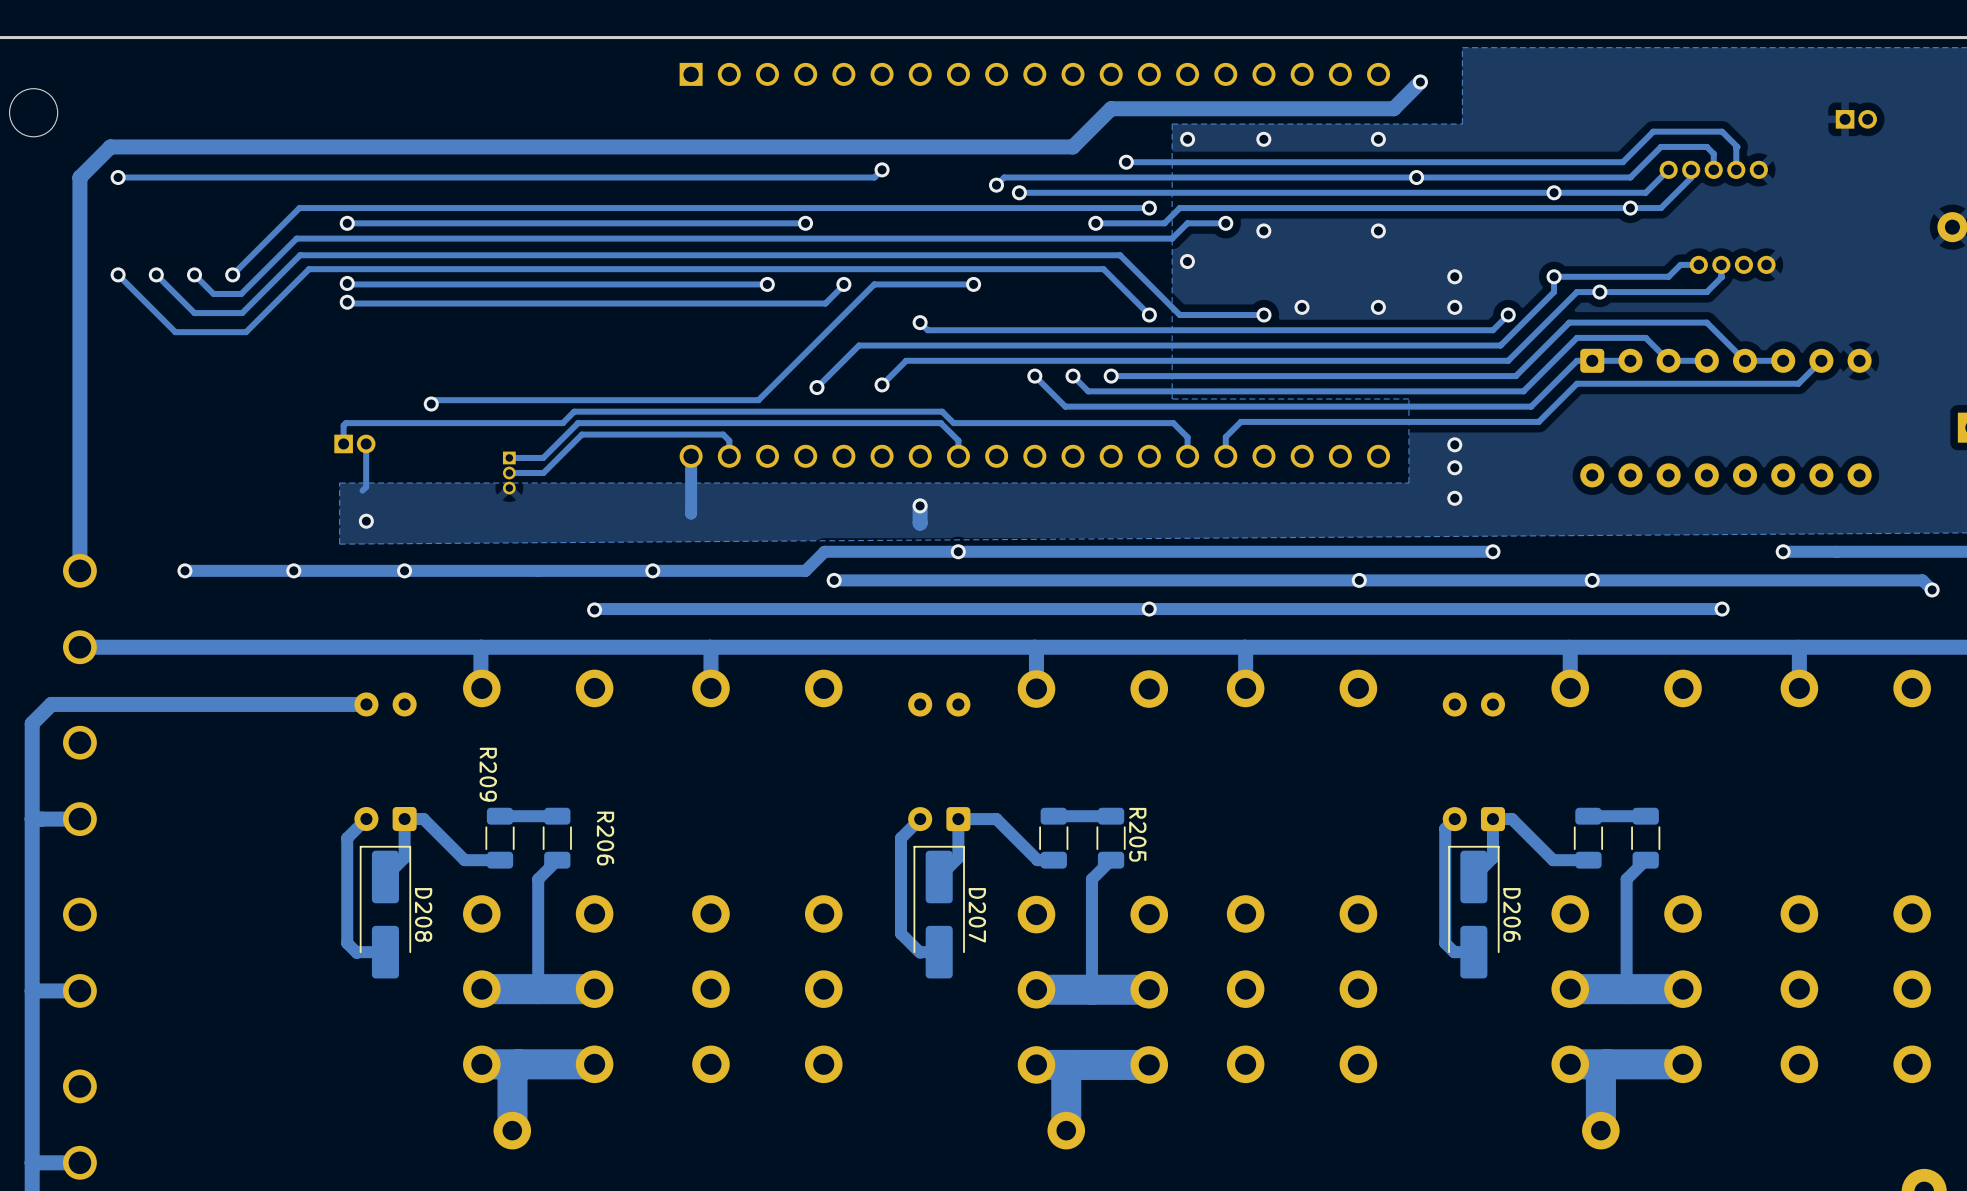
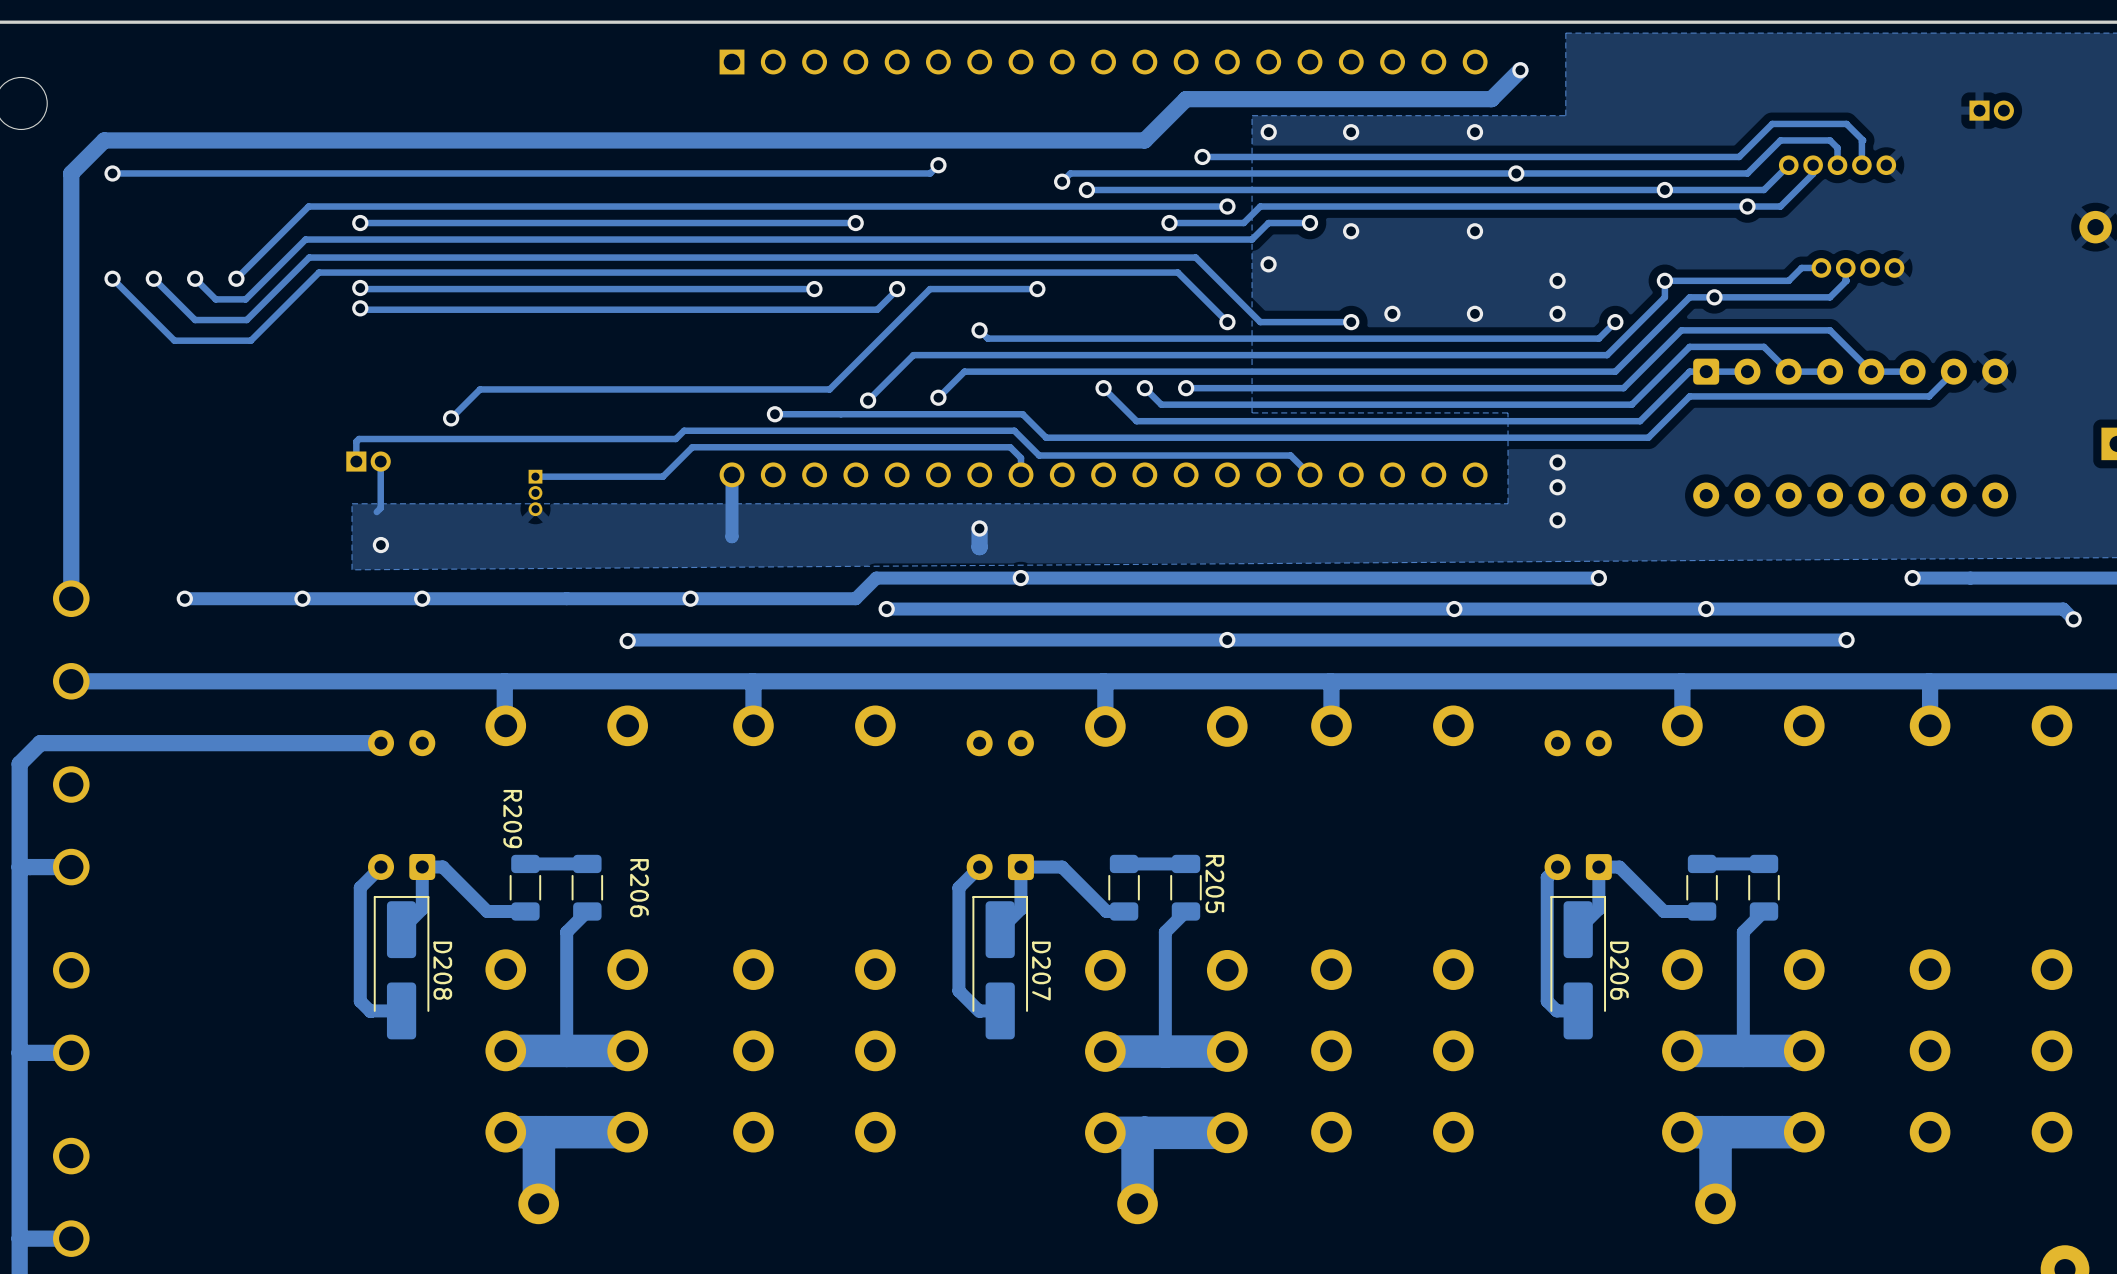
track: (781, 377) (758, 400) -> (1326, 437) (1046, 437) (1022, 414) (804, 414)
track: (730, 400) (435, 400) -> (829, 389) (480, 389) (455, 414)
via: none -> (774, 414)
track: (1240, 421) (1225, 437) (1225, 456) -> (675, 439) (684, 430) (1014, 430) (1039, 455) (1290, 455) (1310, 474)
track: (562, 423) (574, 411) (942, 411) (953, 423) (1173, 423) (1187, 437) (1187, 456) -> none
track: (578, 423) (543, 457) -> (609, 439) (593, 439)
track: (639, 423) (940, 423) (948, 430) -> (572, 476) (662, 476) (692, 447) (1010, 447)
track: (729, 456) (729, 440) (723, 434) (581, 434) (543, 473) (509, 473) -> none

